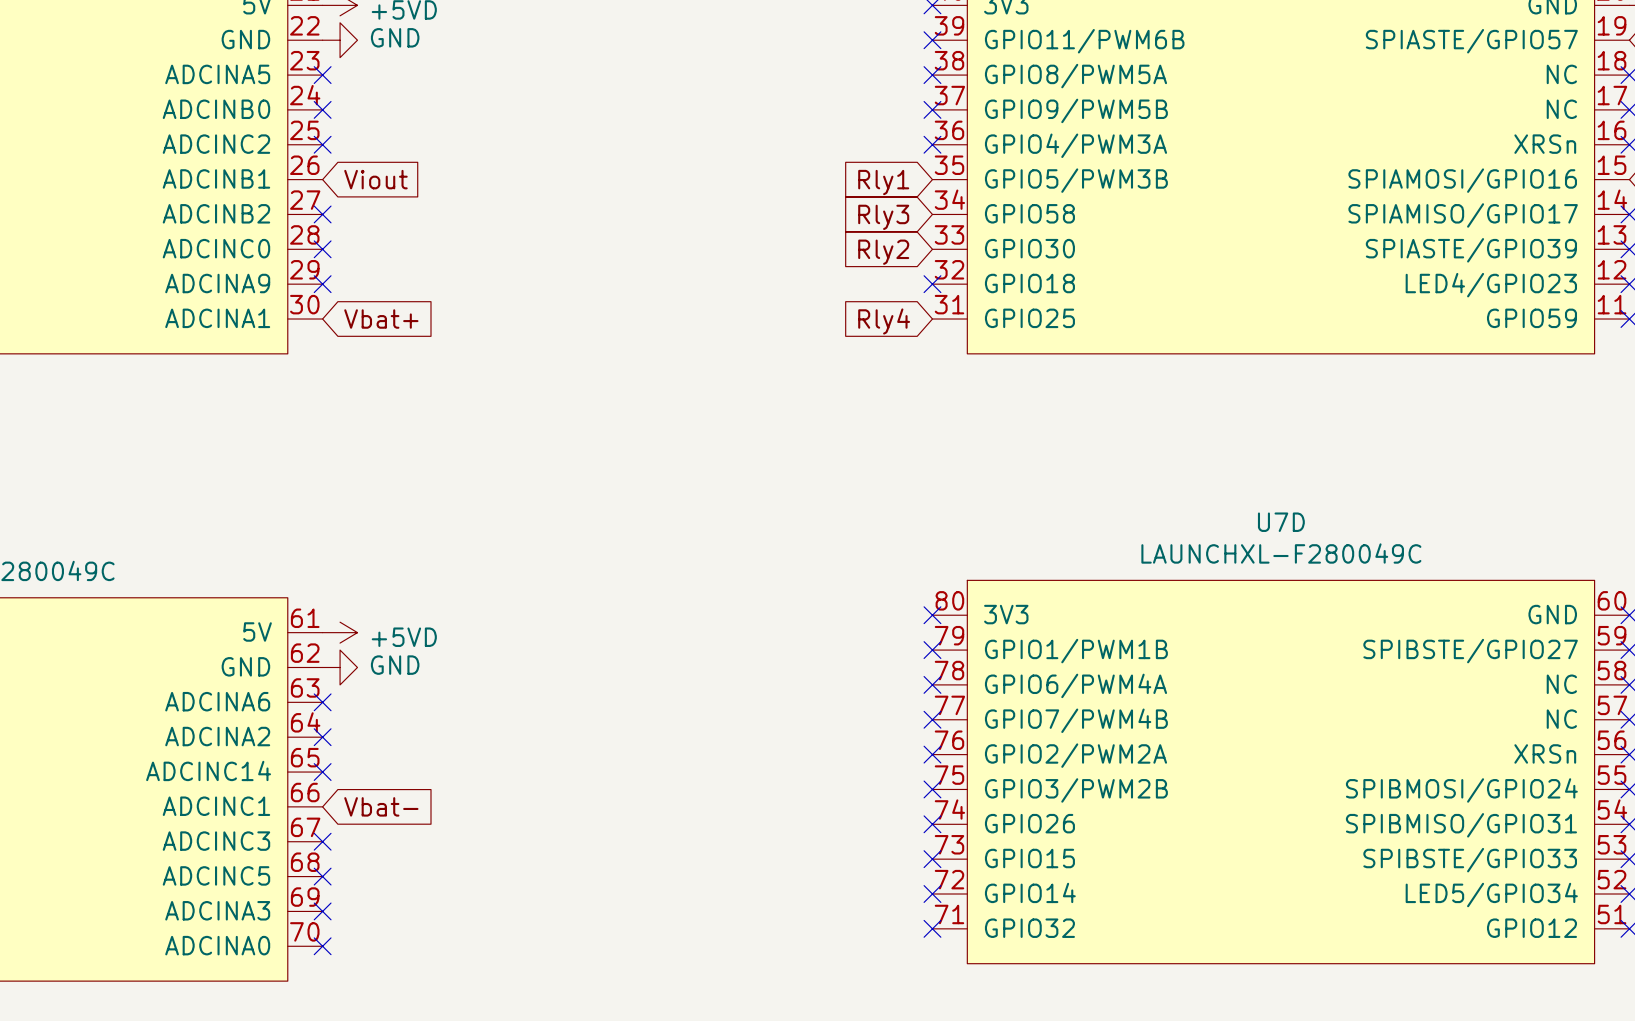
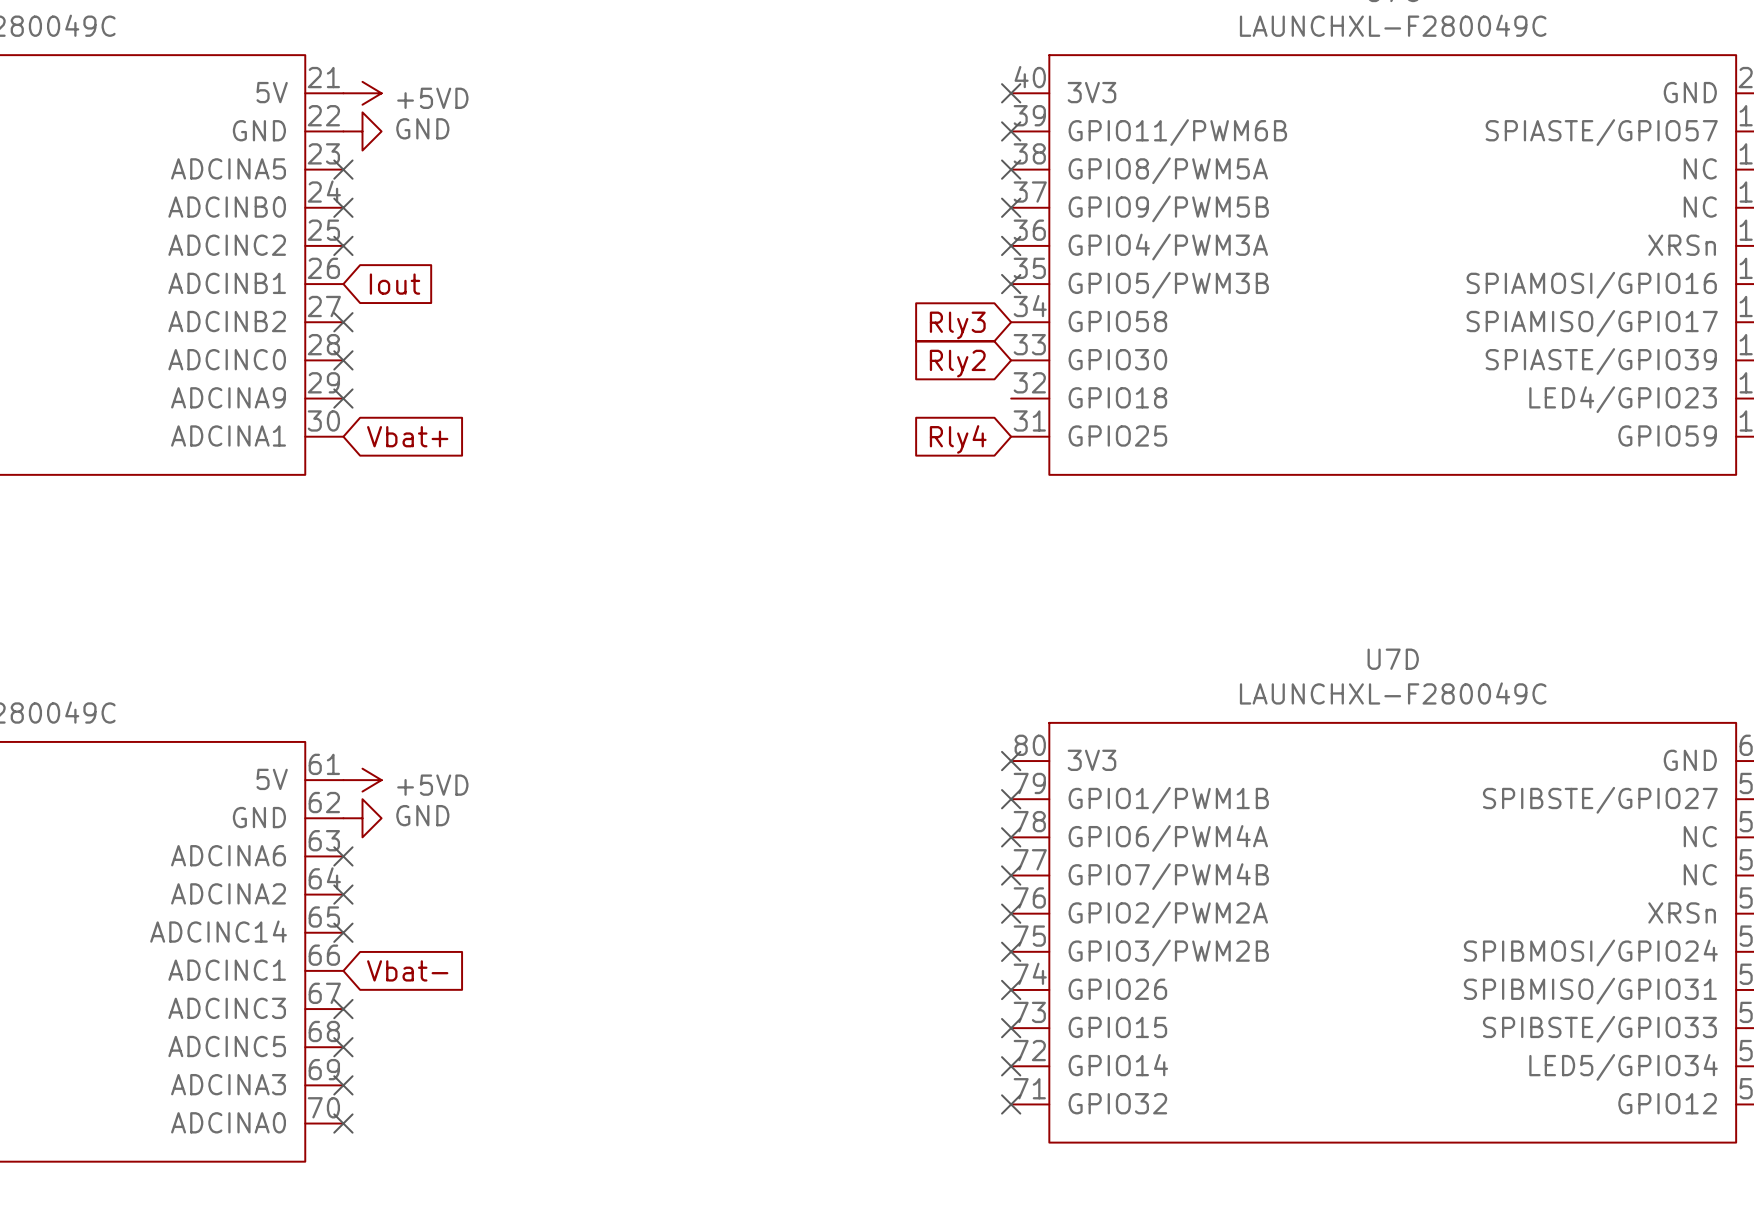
global label: Viout (375, 179) -> Iout (395, 284)
no-connect mark: none -> (1011, 284)
global label: Rly1 (883, 182) -> none
no-connect mark: (932, 284) -> none

